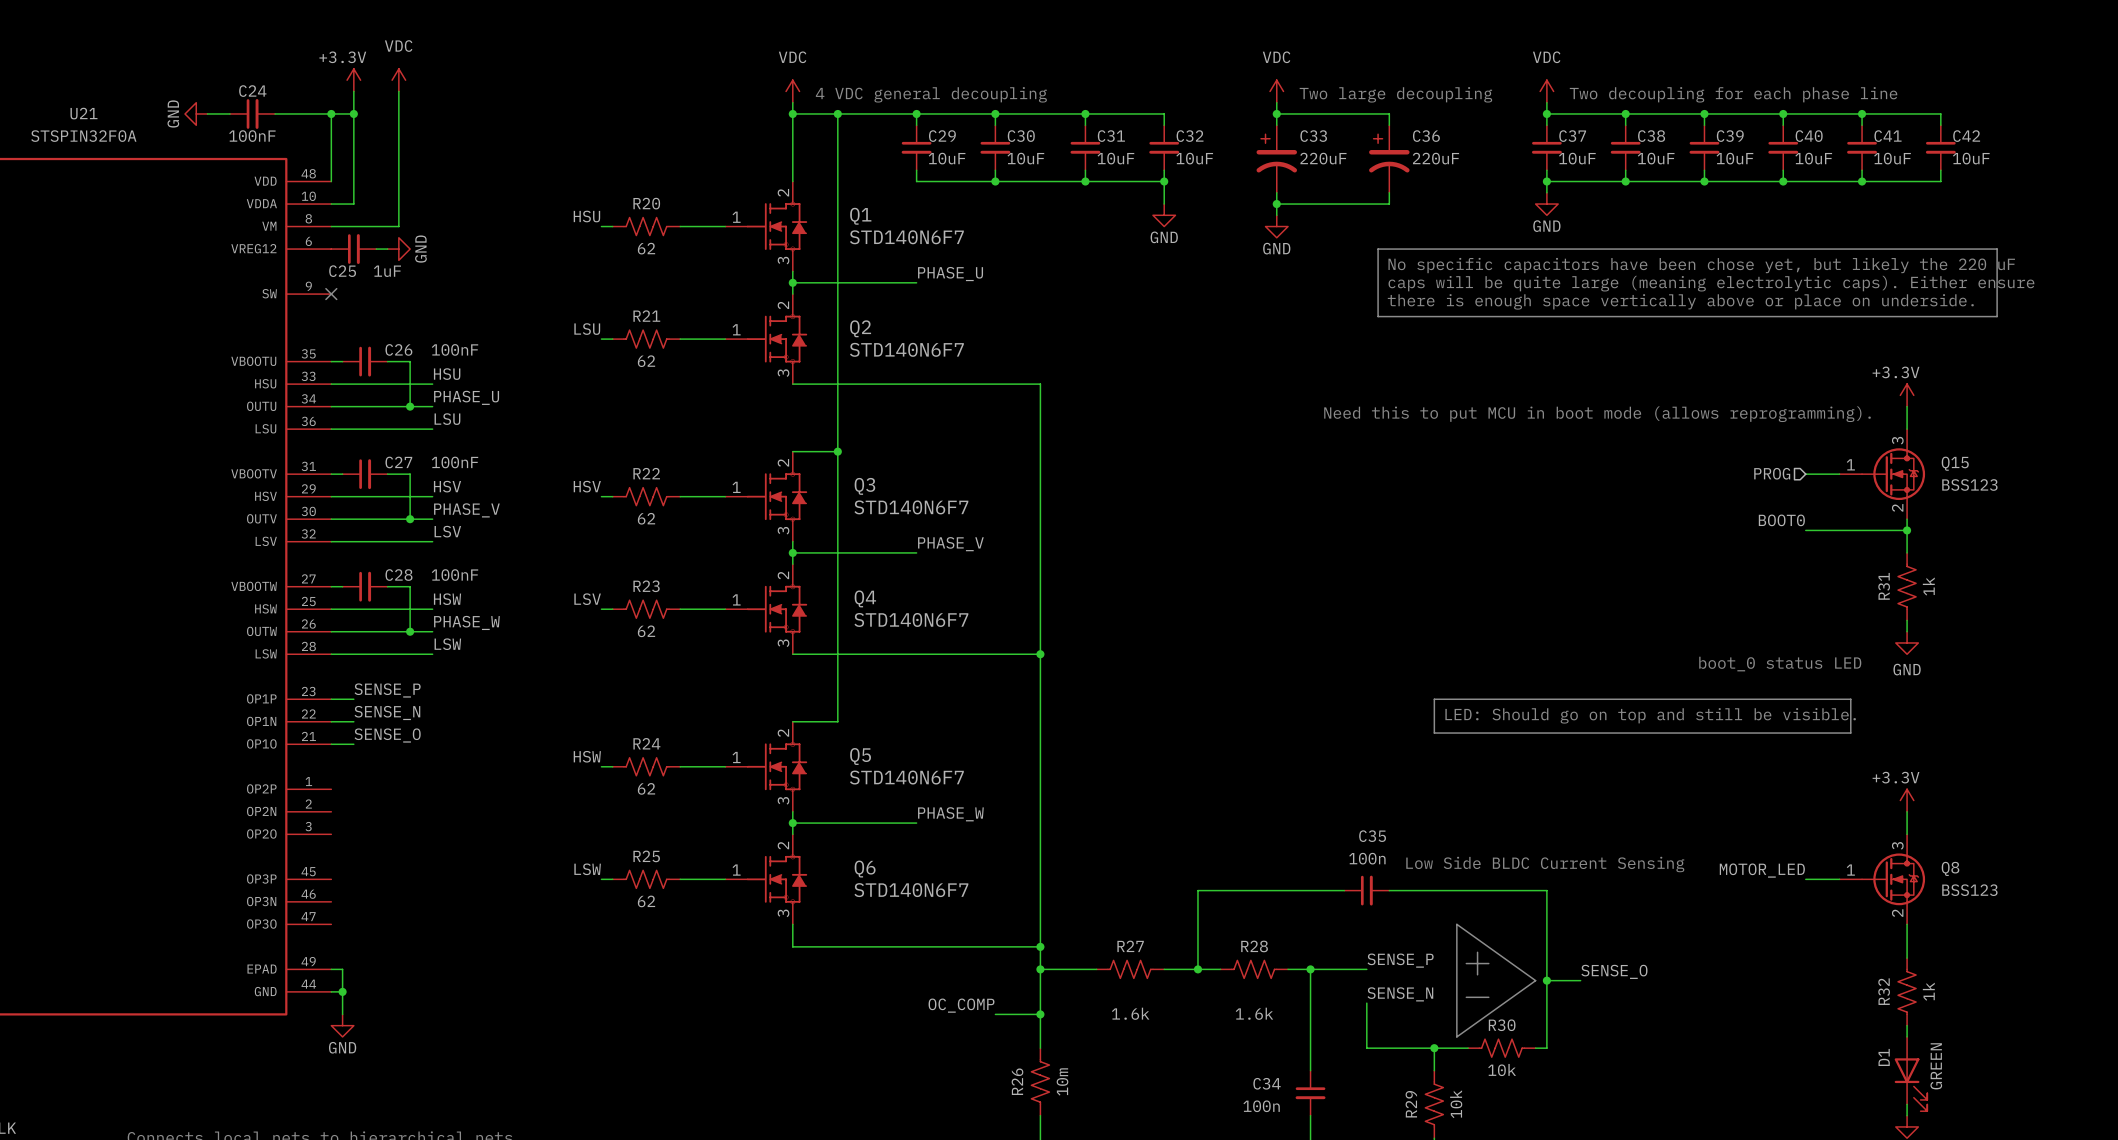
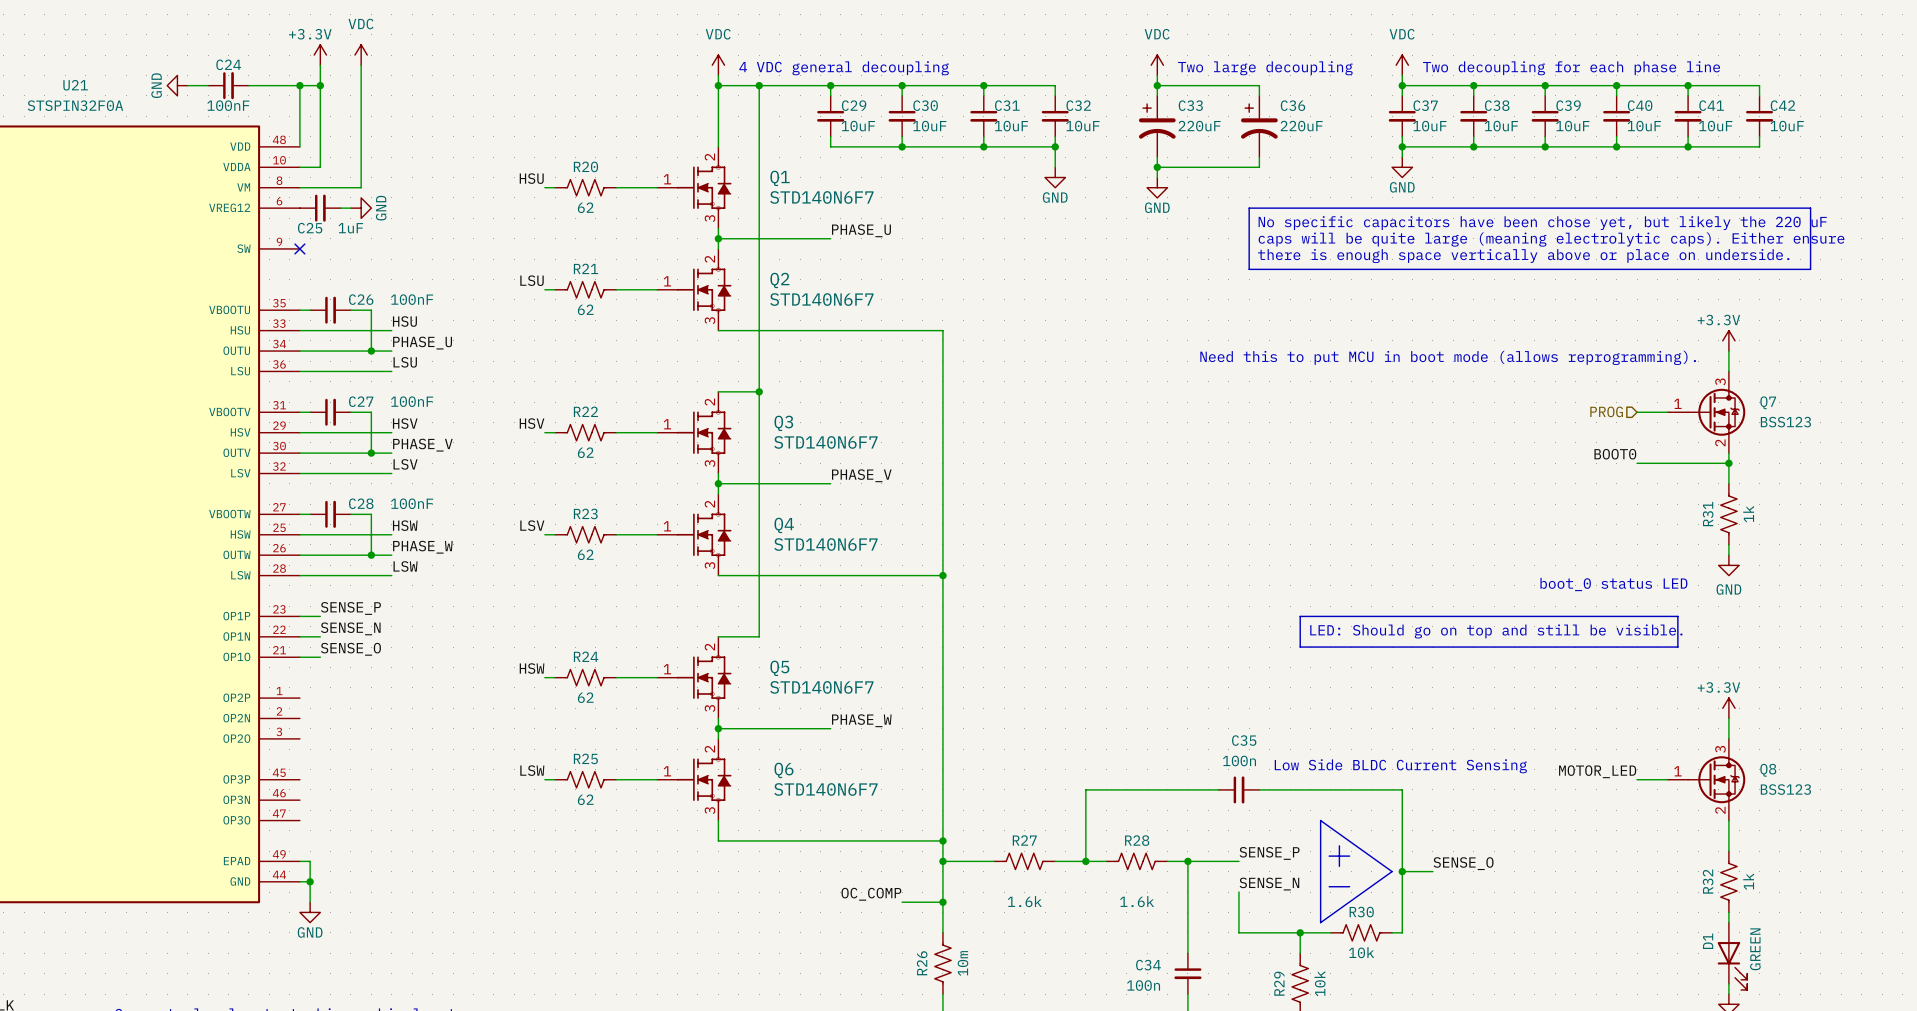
Q15 name: Q15 (1955, 463) -> Q7 (1768, 402)

